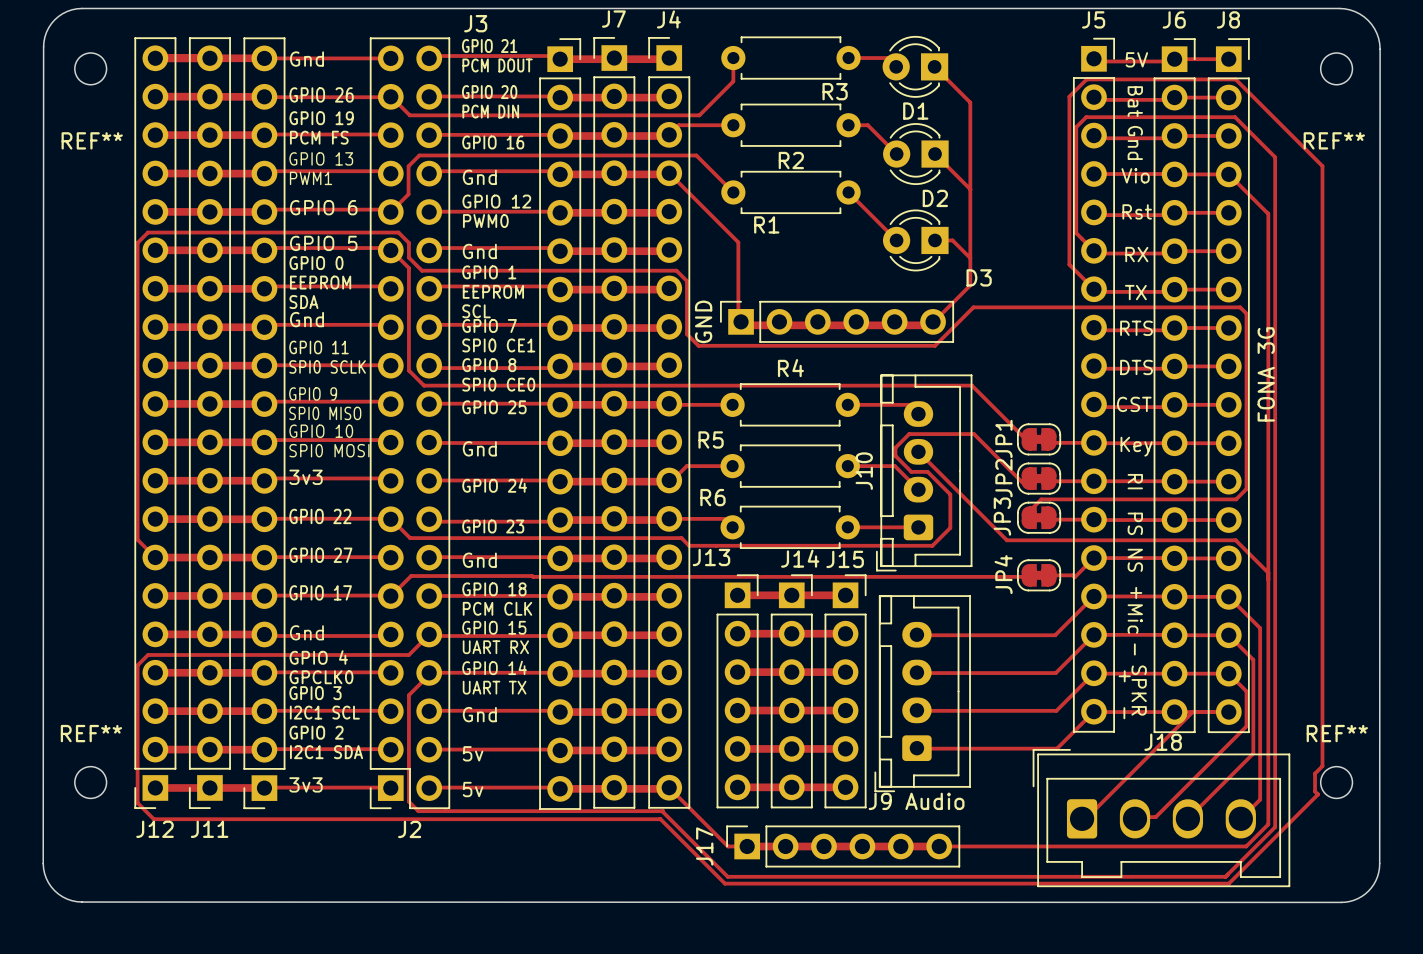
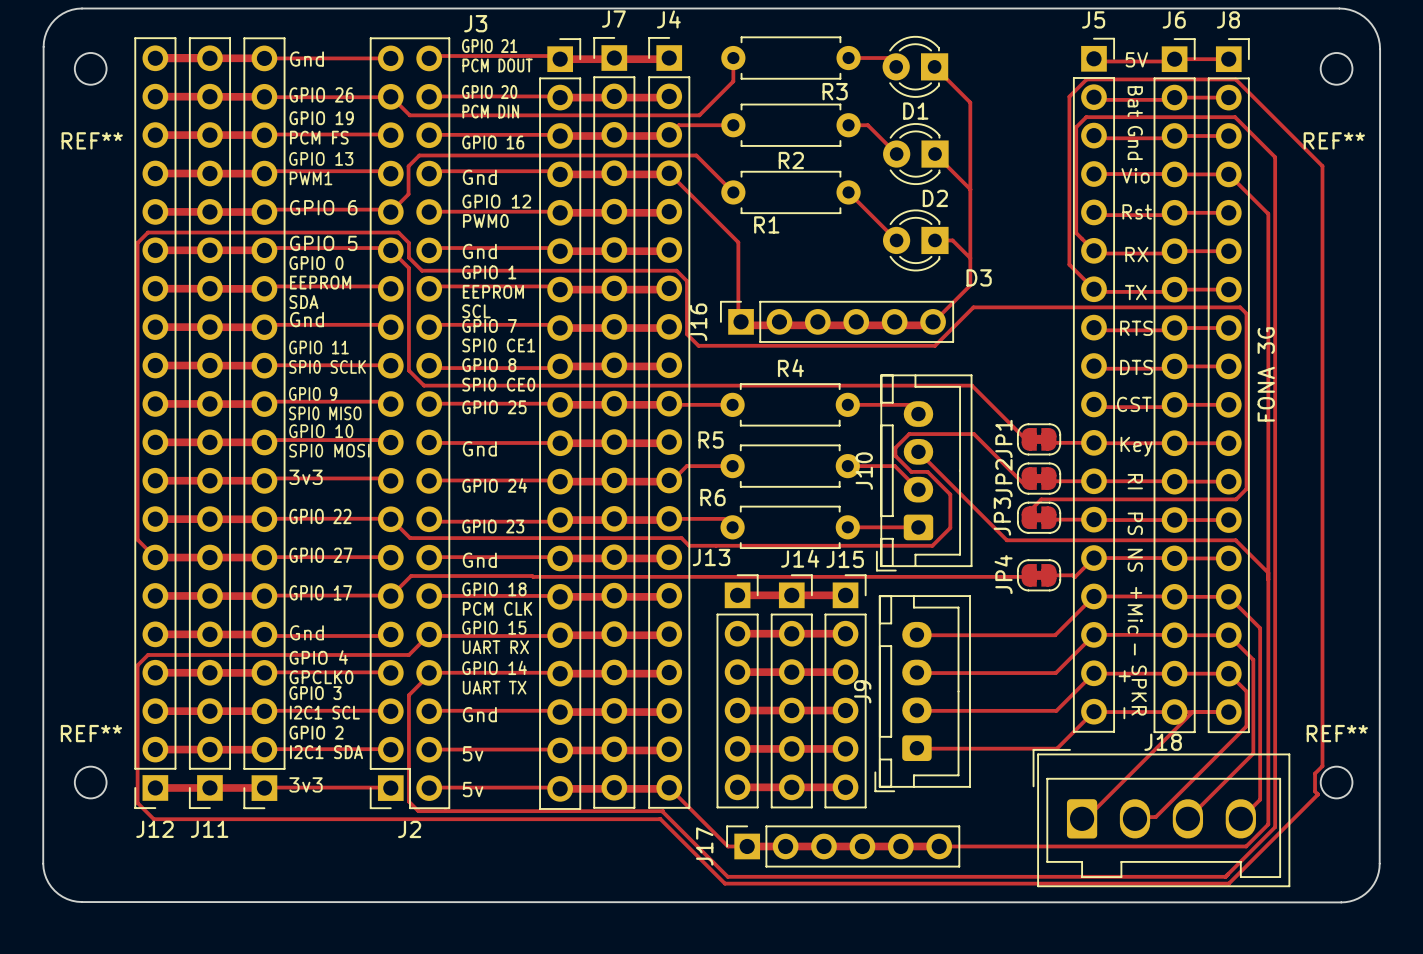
GND name: GND (703, 321) -> J16 (698, 322)
J9 Audio name: J9 Audio (916, 801) -> J9 (862, 691)

